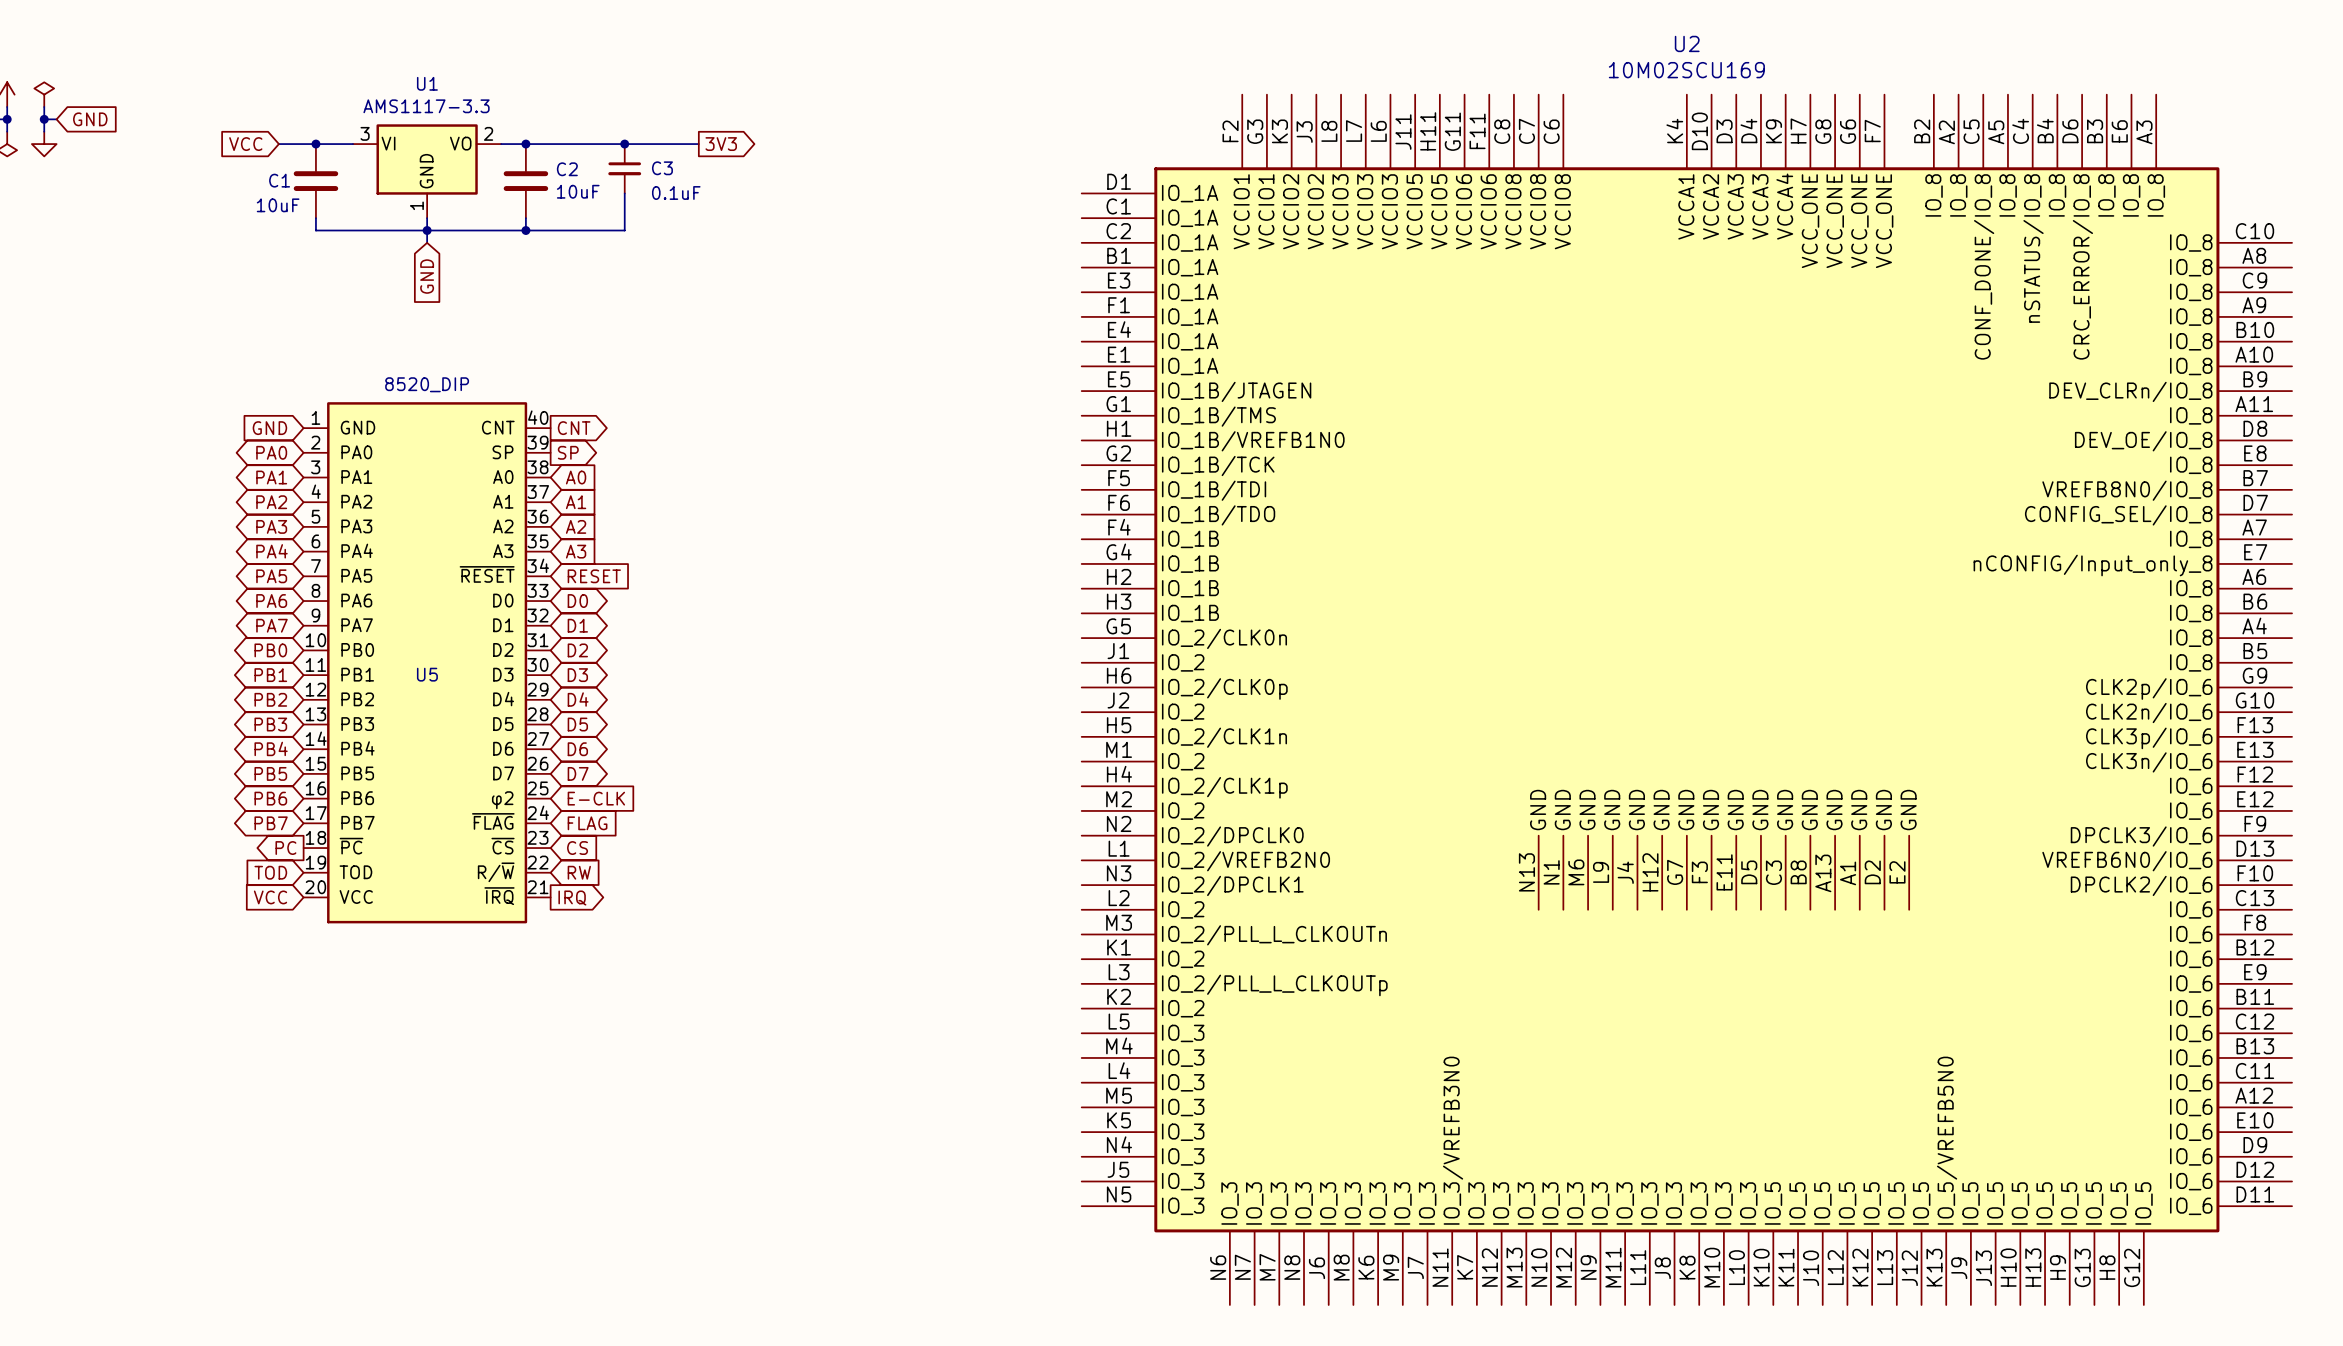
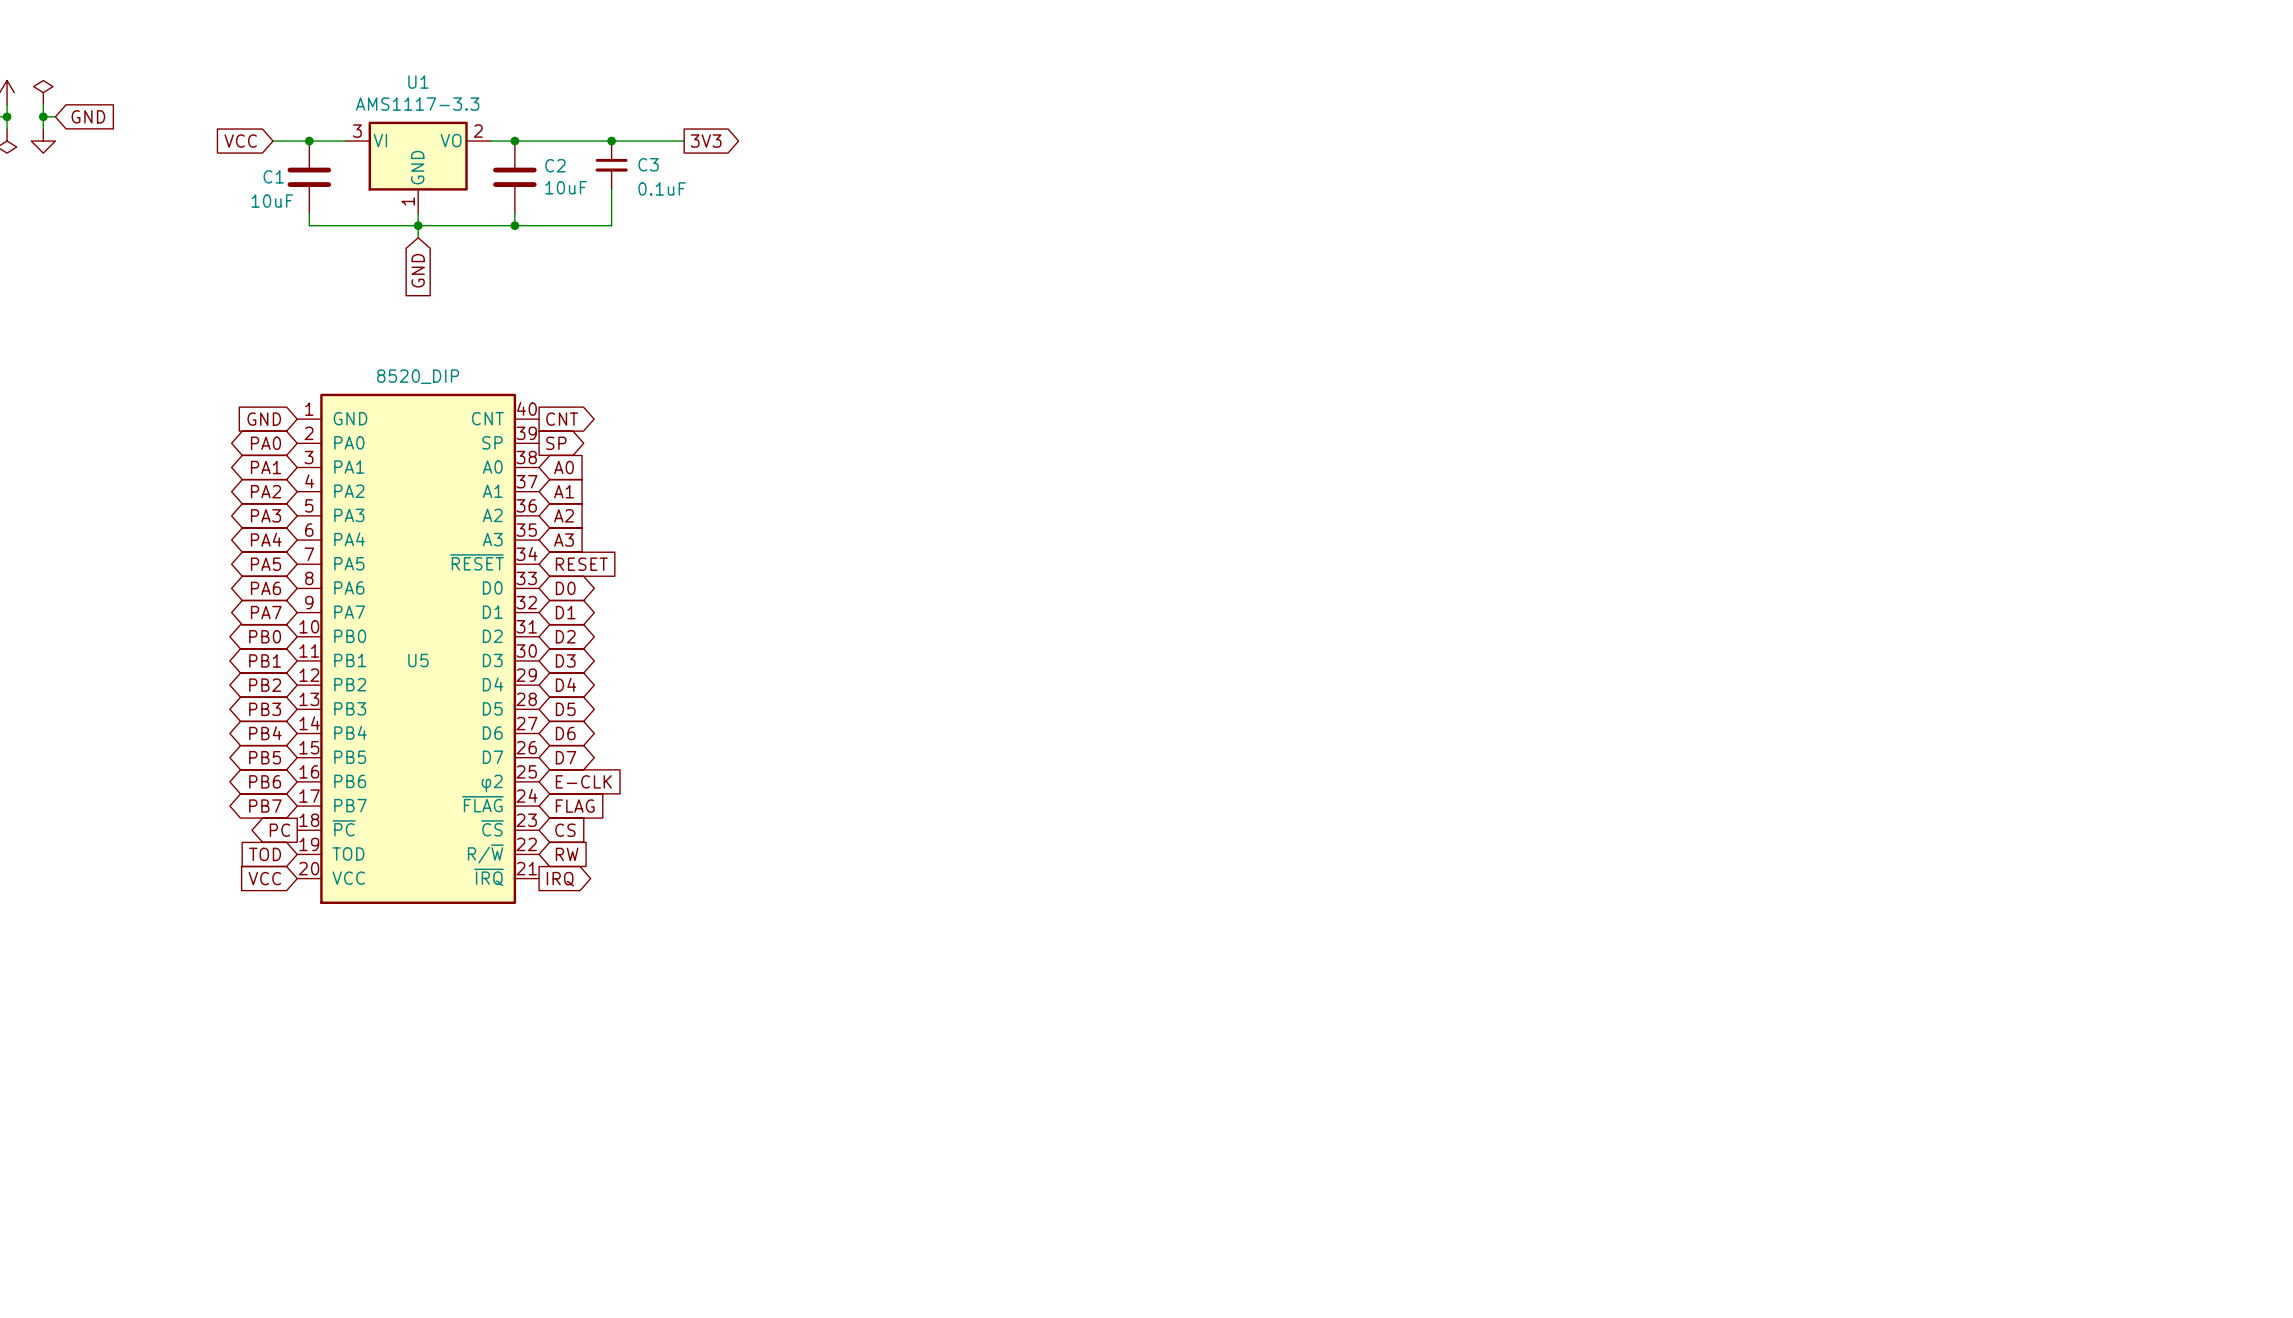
U2: 10M02SCU169 (1686, 699) -> none

